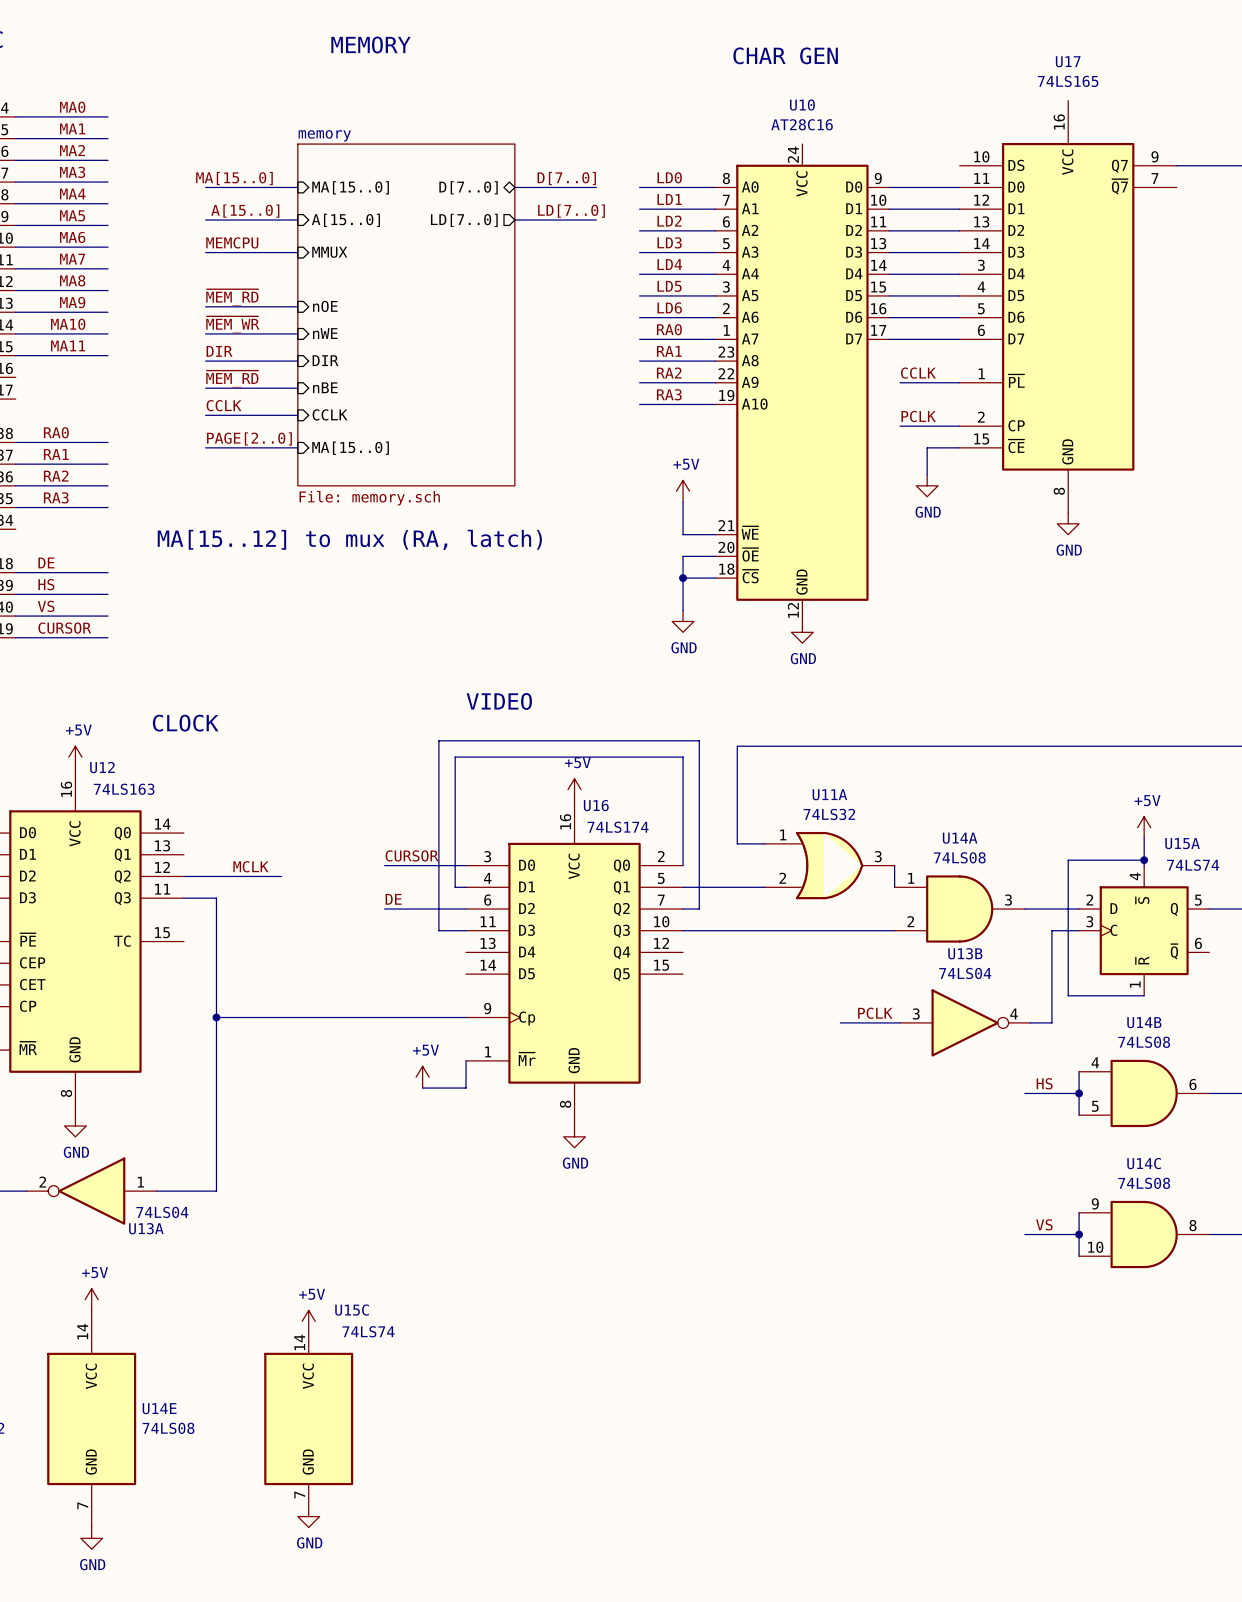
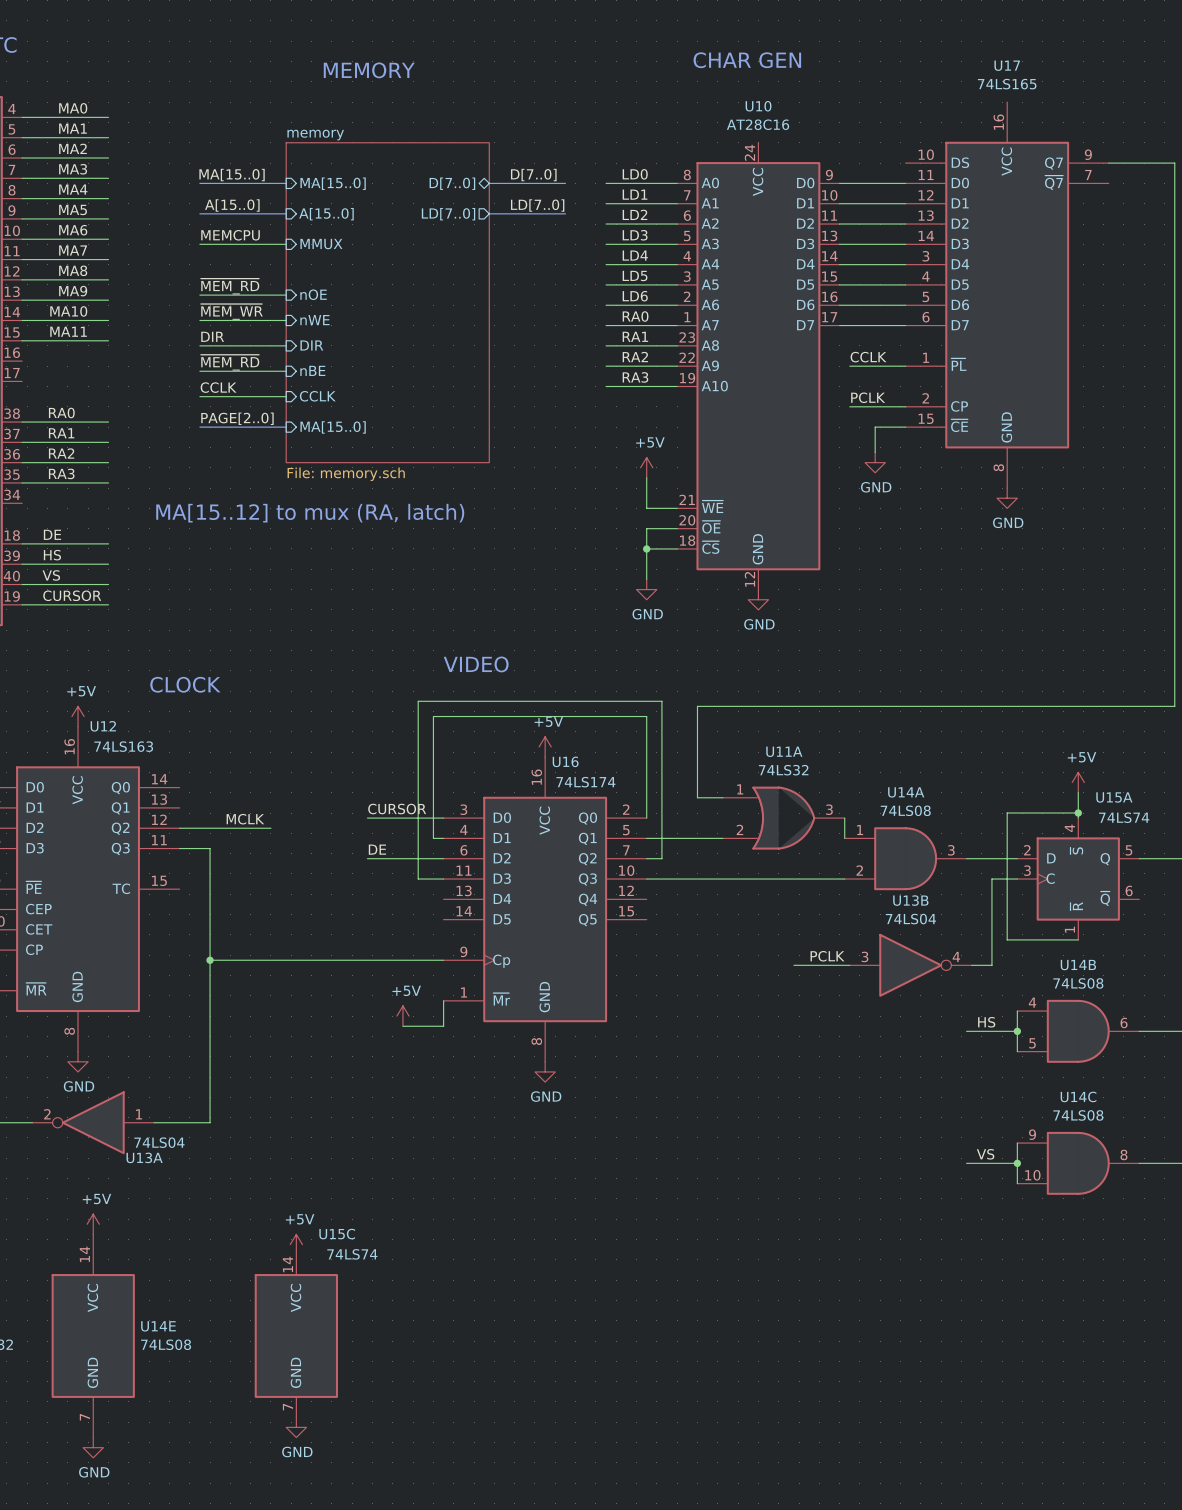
text position: MEMORY (370, 45) -> MEMORY (369, 70)

